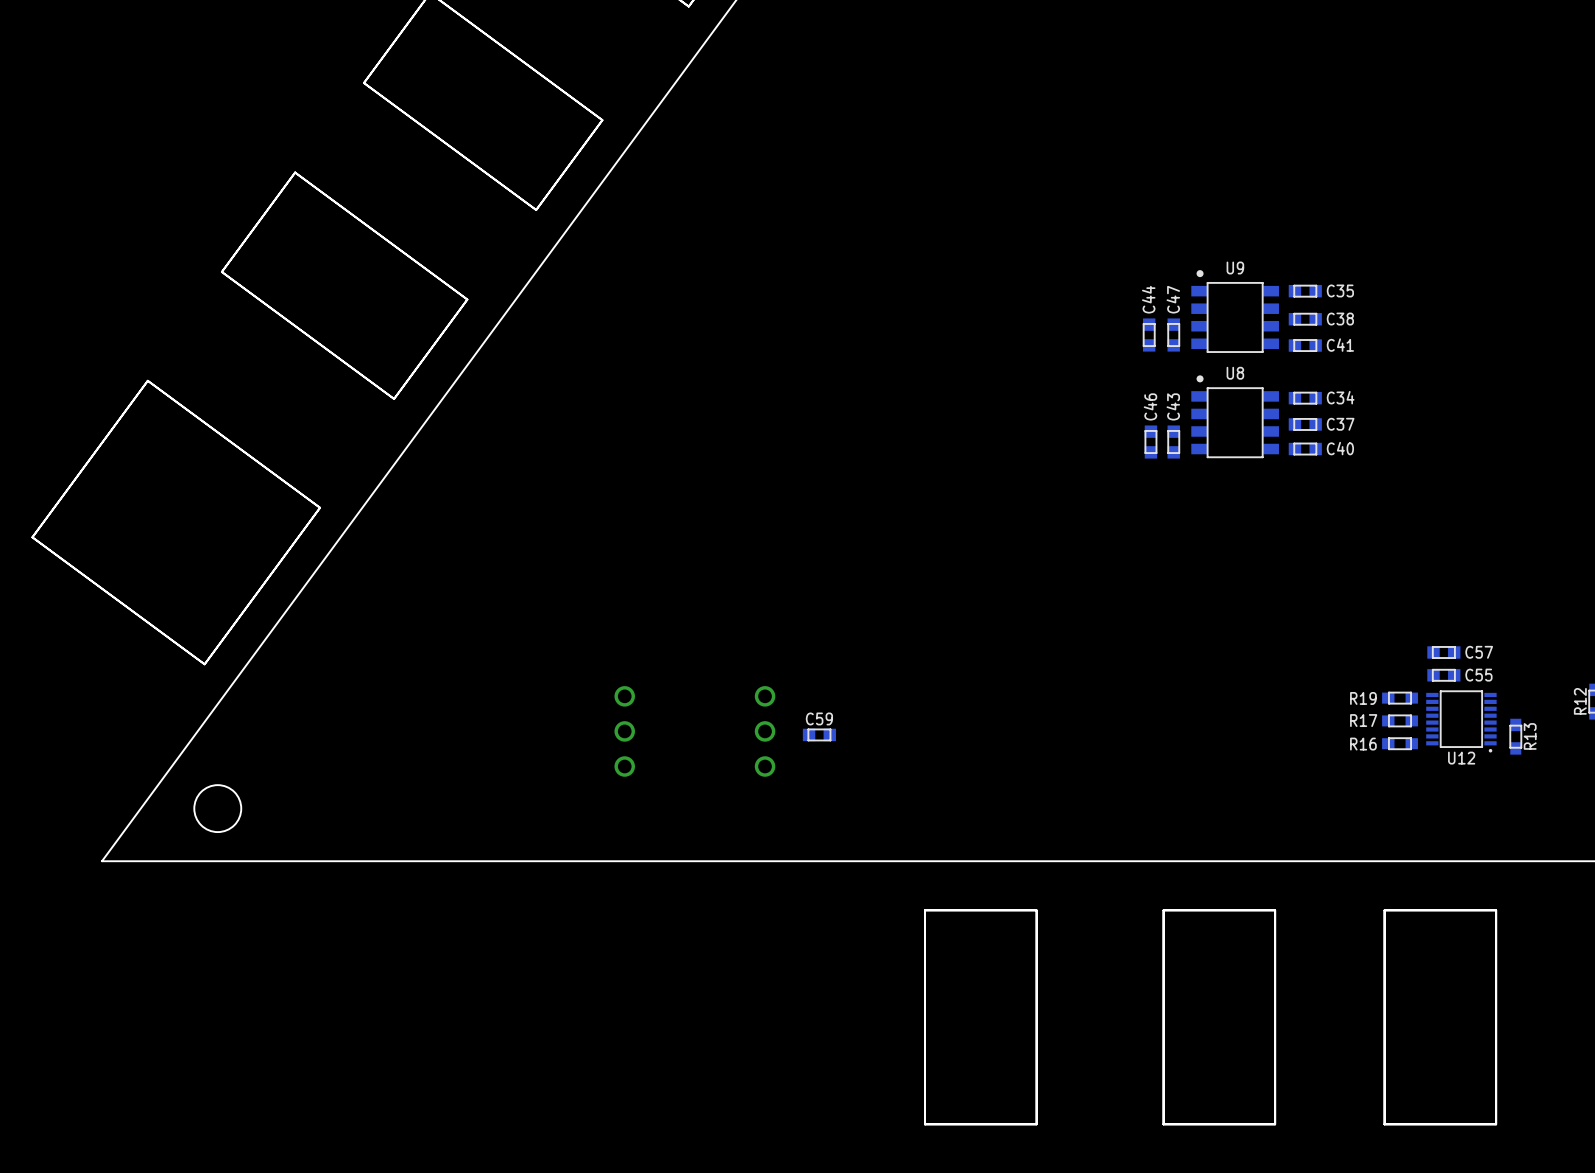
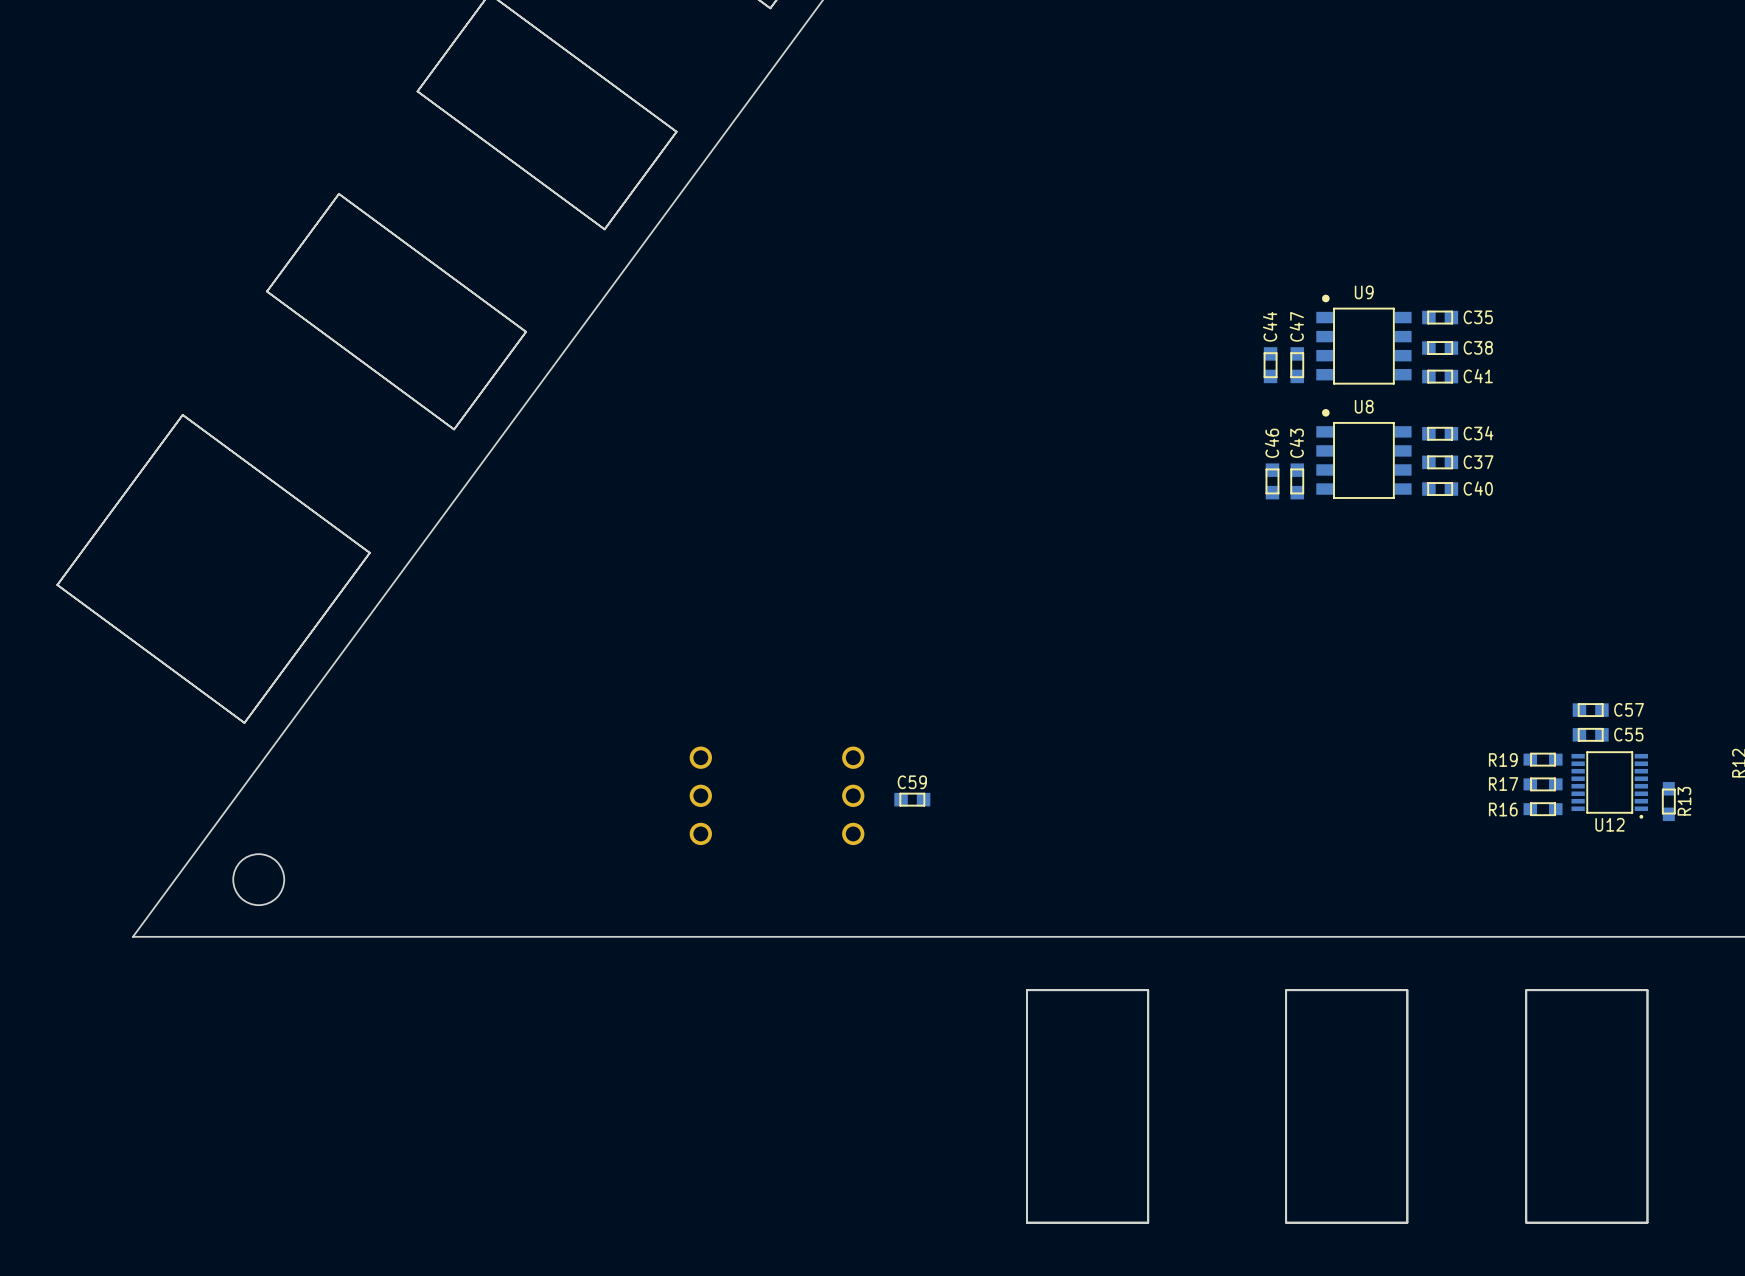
part footprint: [221, 172, 468, 399] -> [267, 193, 527, 430]

